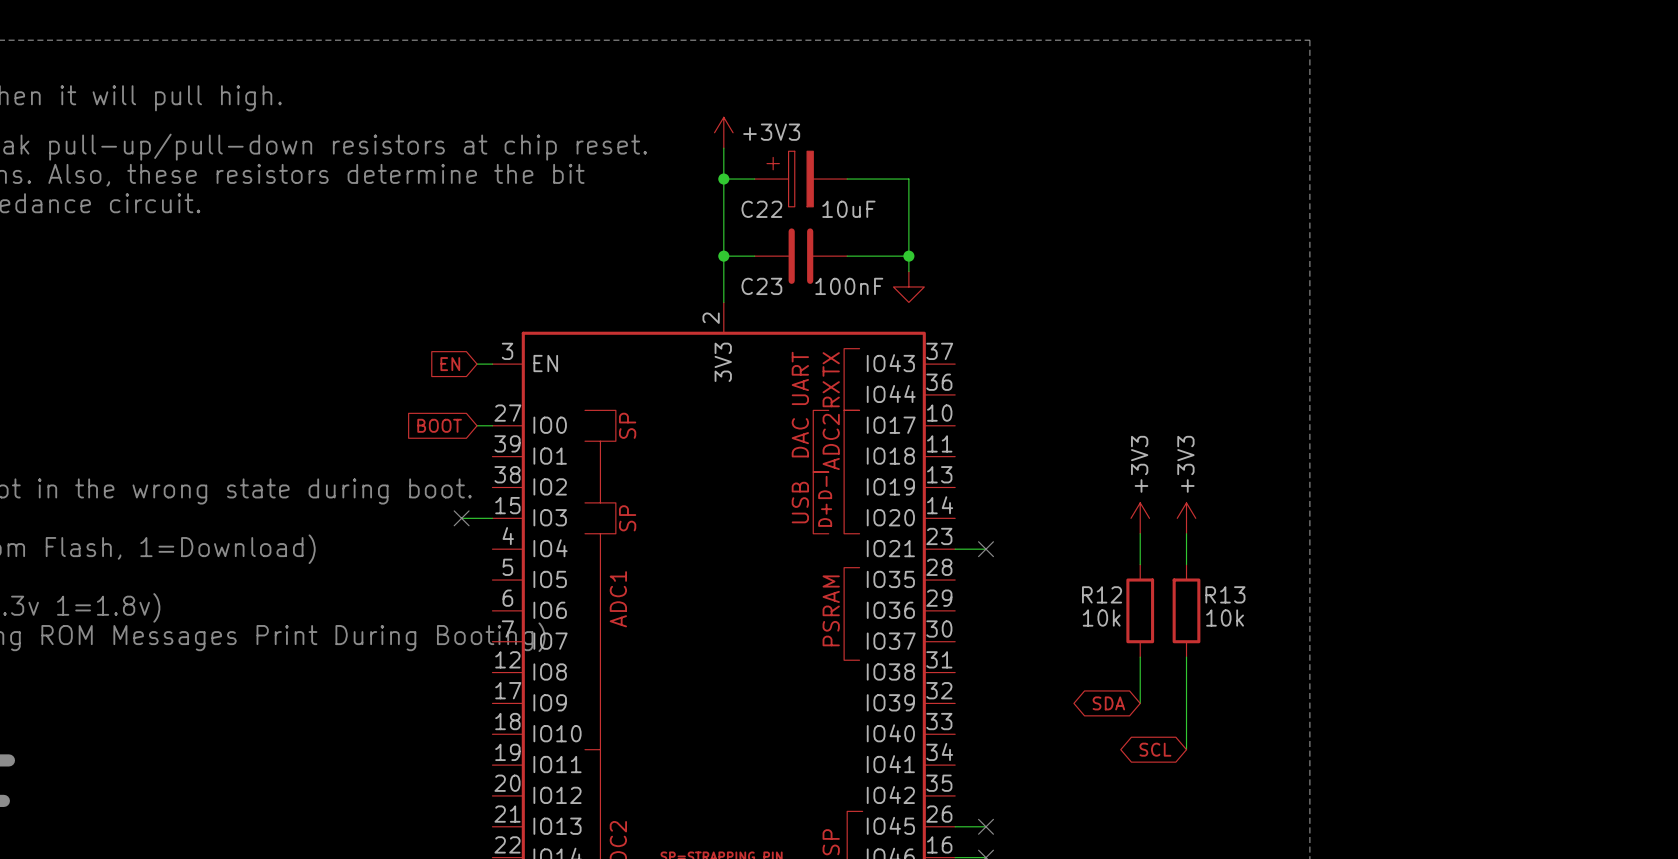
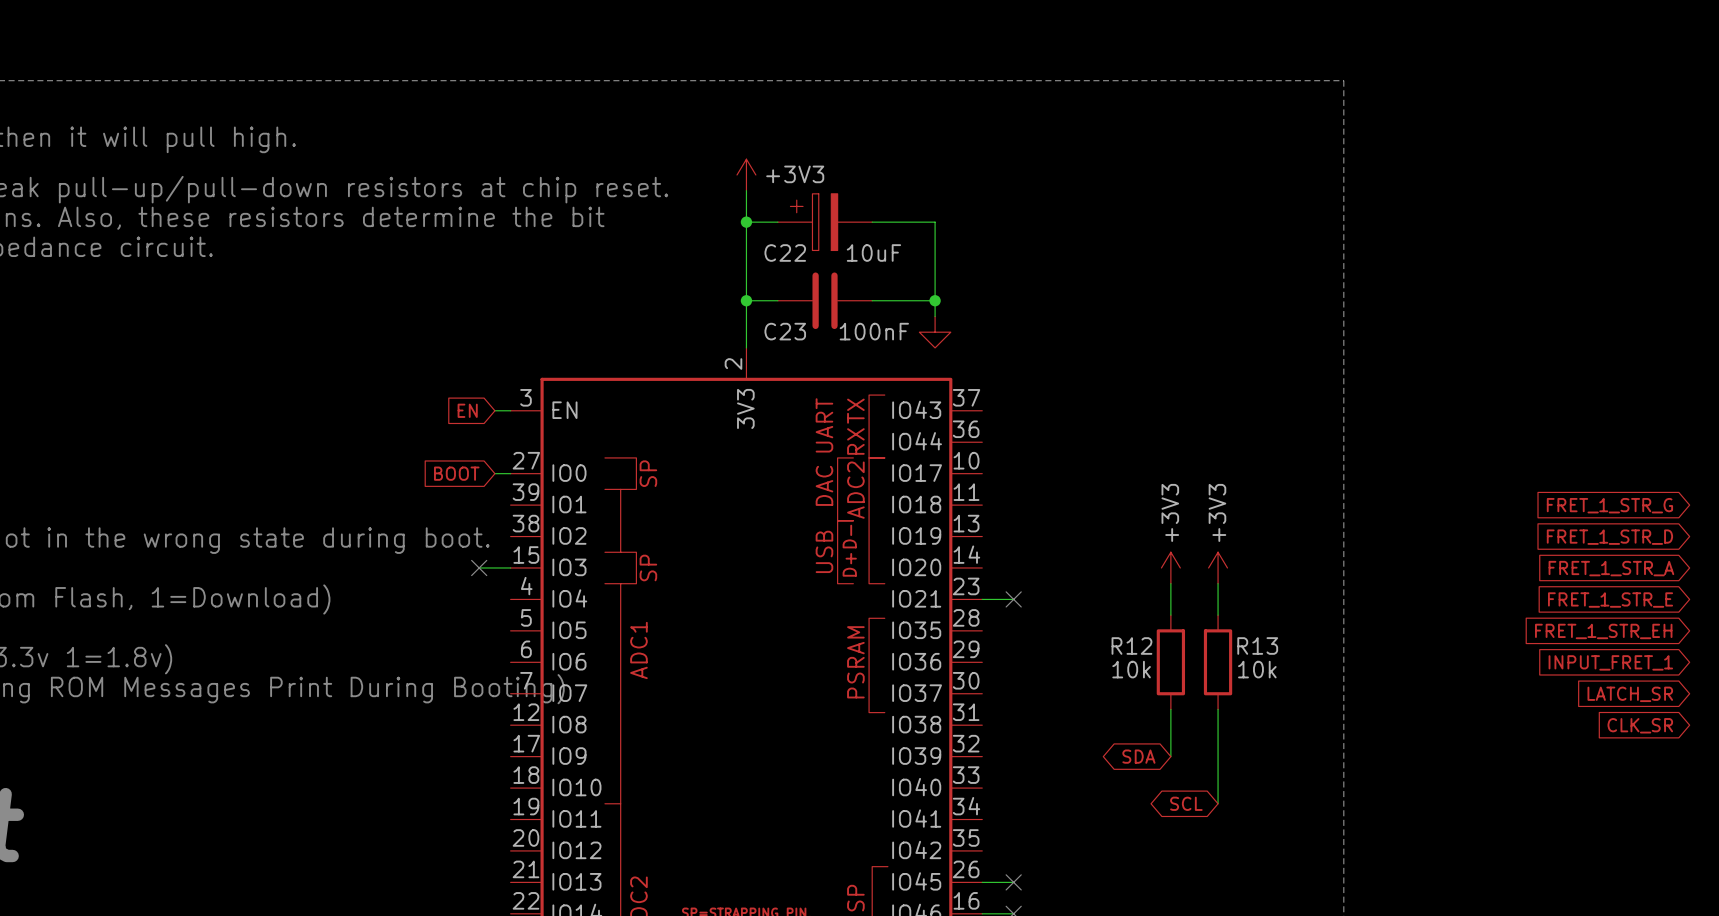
global label: none -> FRET_1_STR_G (1609, 505)
global label: none -> FRET_1_STR_D (1609, 537)
global label: none -> FRET_1_STR_A (1611, 568)
global label: none -> FRET_1_STR_E (1610, 600)
global label: none -> FRET_1_STR_EH (1603, 631)
global label: none -> INPUT_FRET_1 (1610, 662)
global label: none -> LATCH_SR (1630, 694)
global label: none -> CLK_SR (1640, 725)

